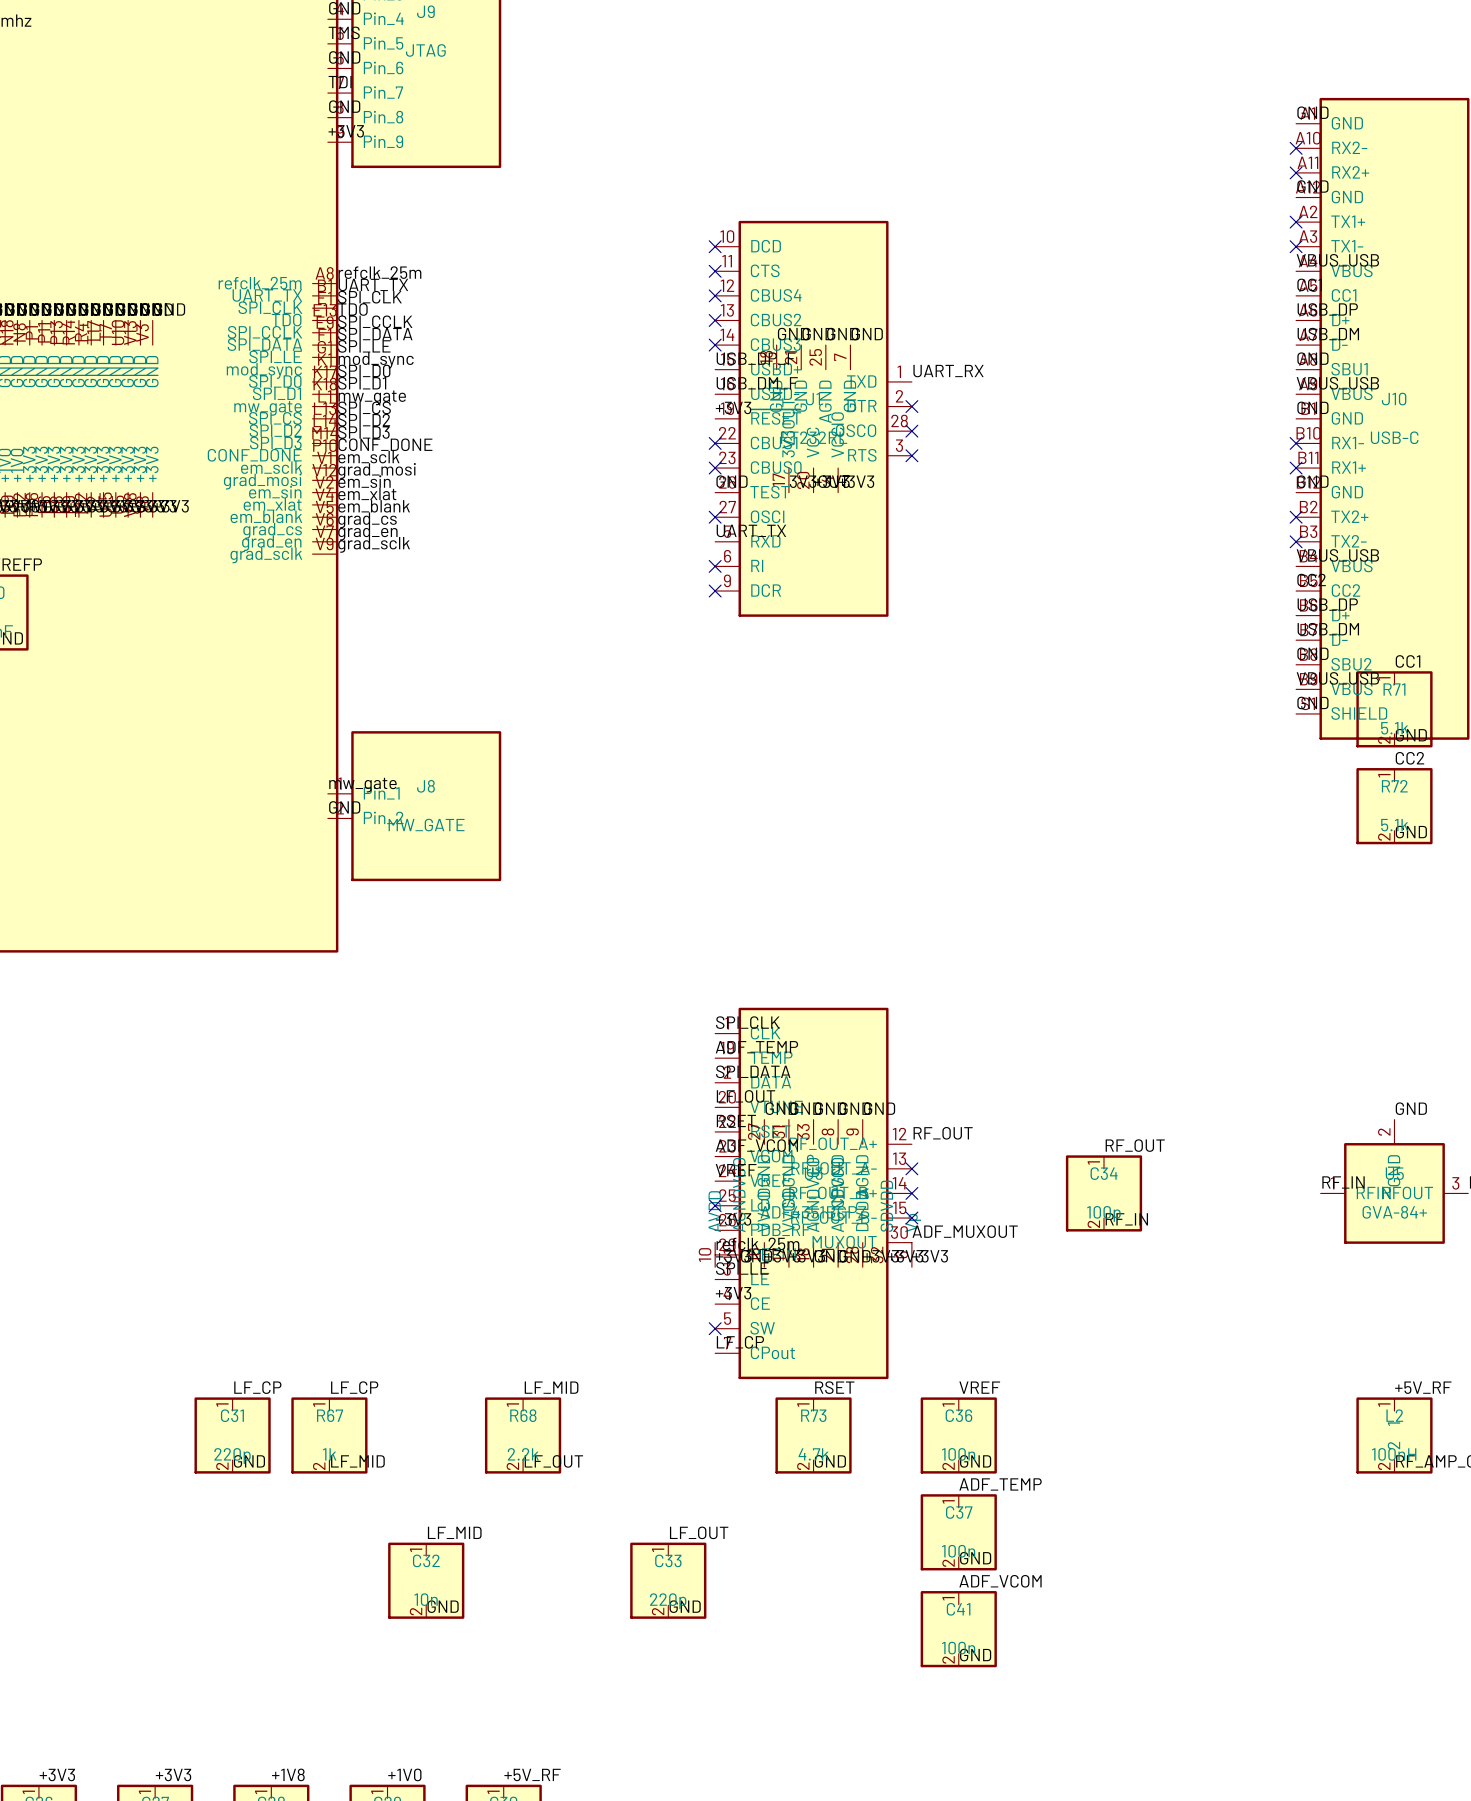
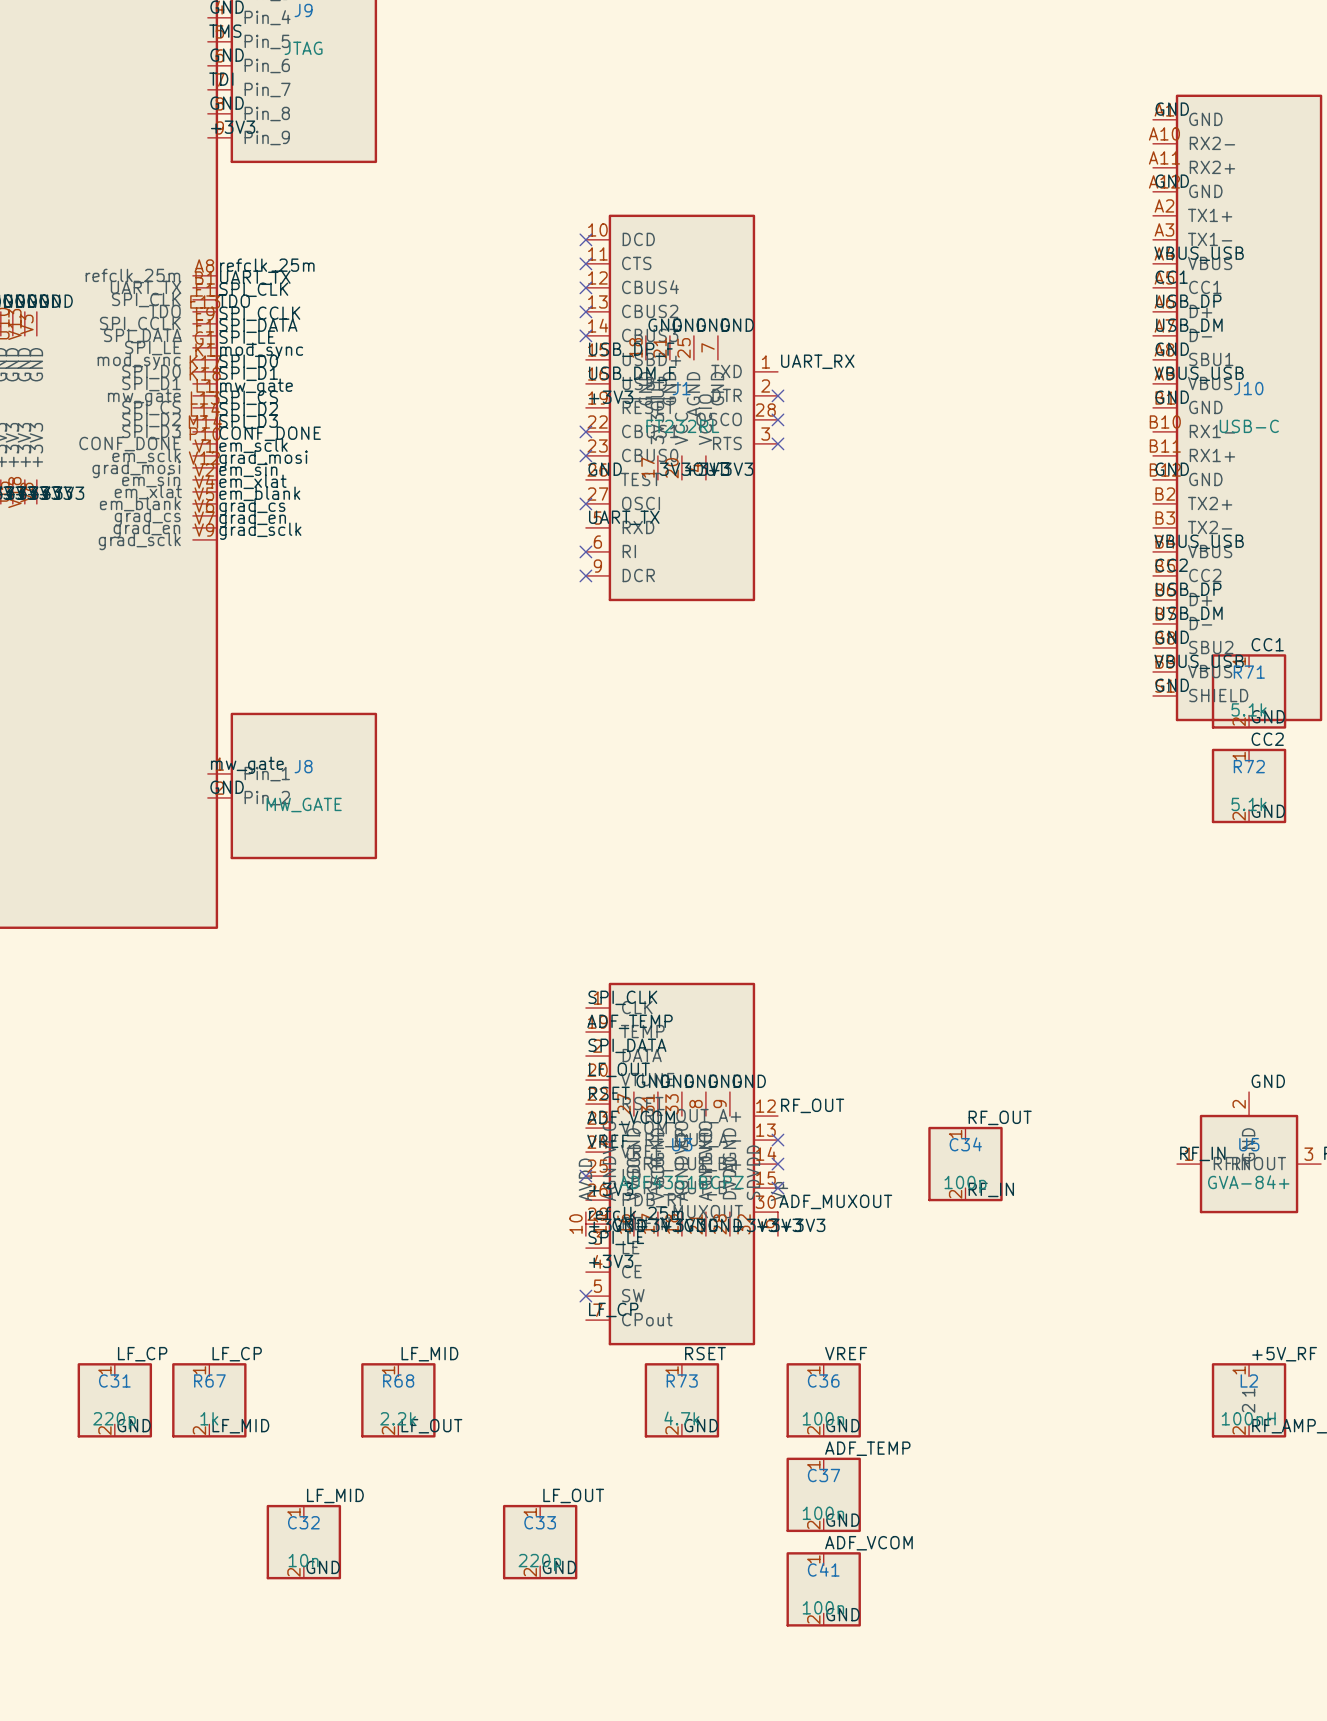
no-connect mark: (1296, 148) -> none
no-connect mark: (1296, 172) -> none
no-connect mark: (1296, 222) -> none
no-connect mark: (1296, 246) -> none
no-connect mark: (1296, 443) -> none
no-connect mark: (1296, 468) -> none
no-connect mark: (1296, 517) -> none
no-connect mark: (1296, 541) -> none

